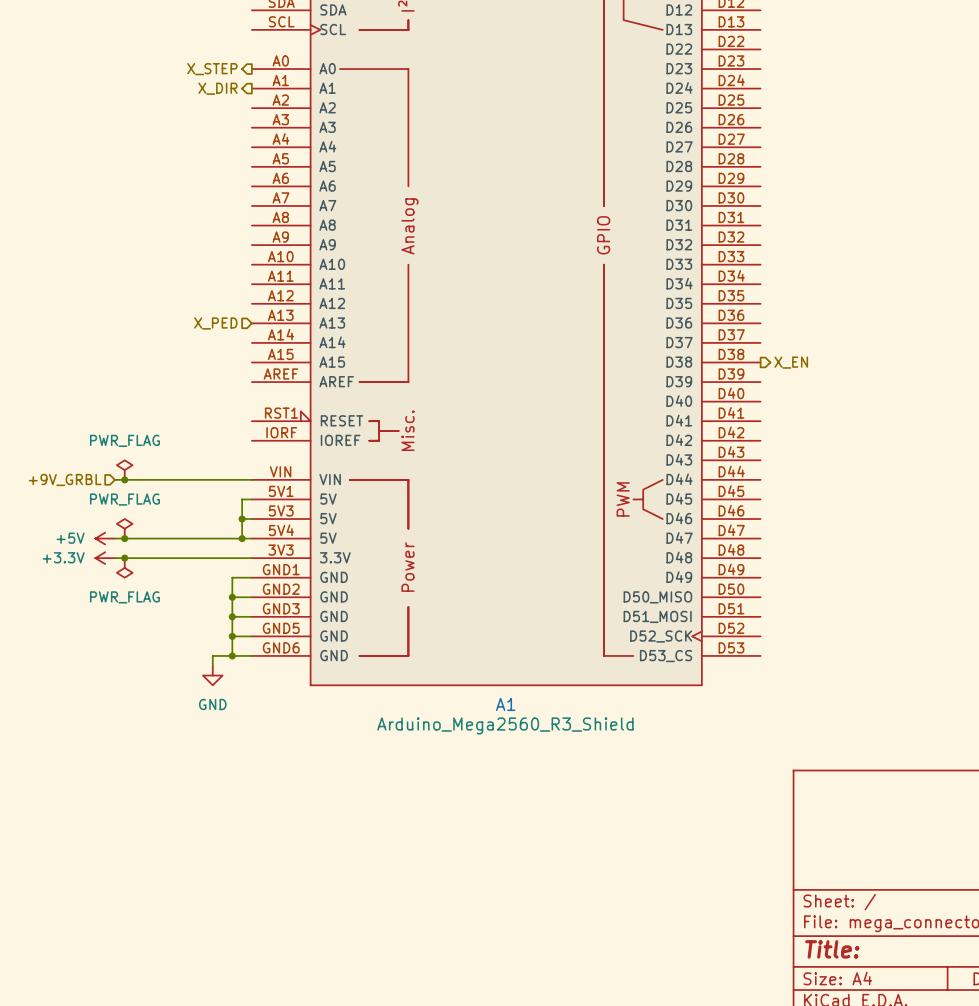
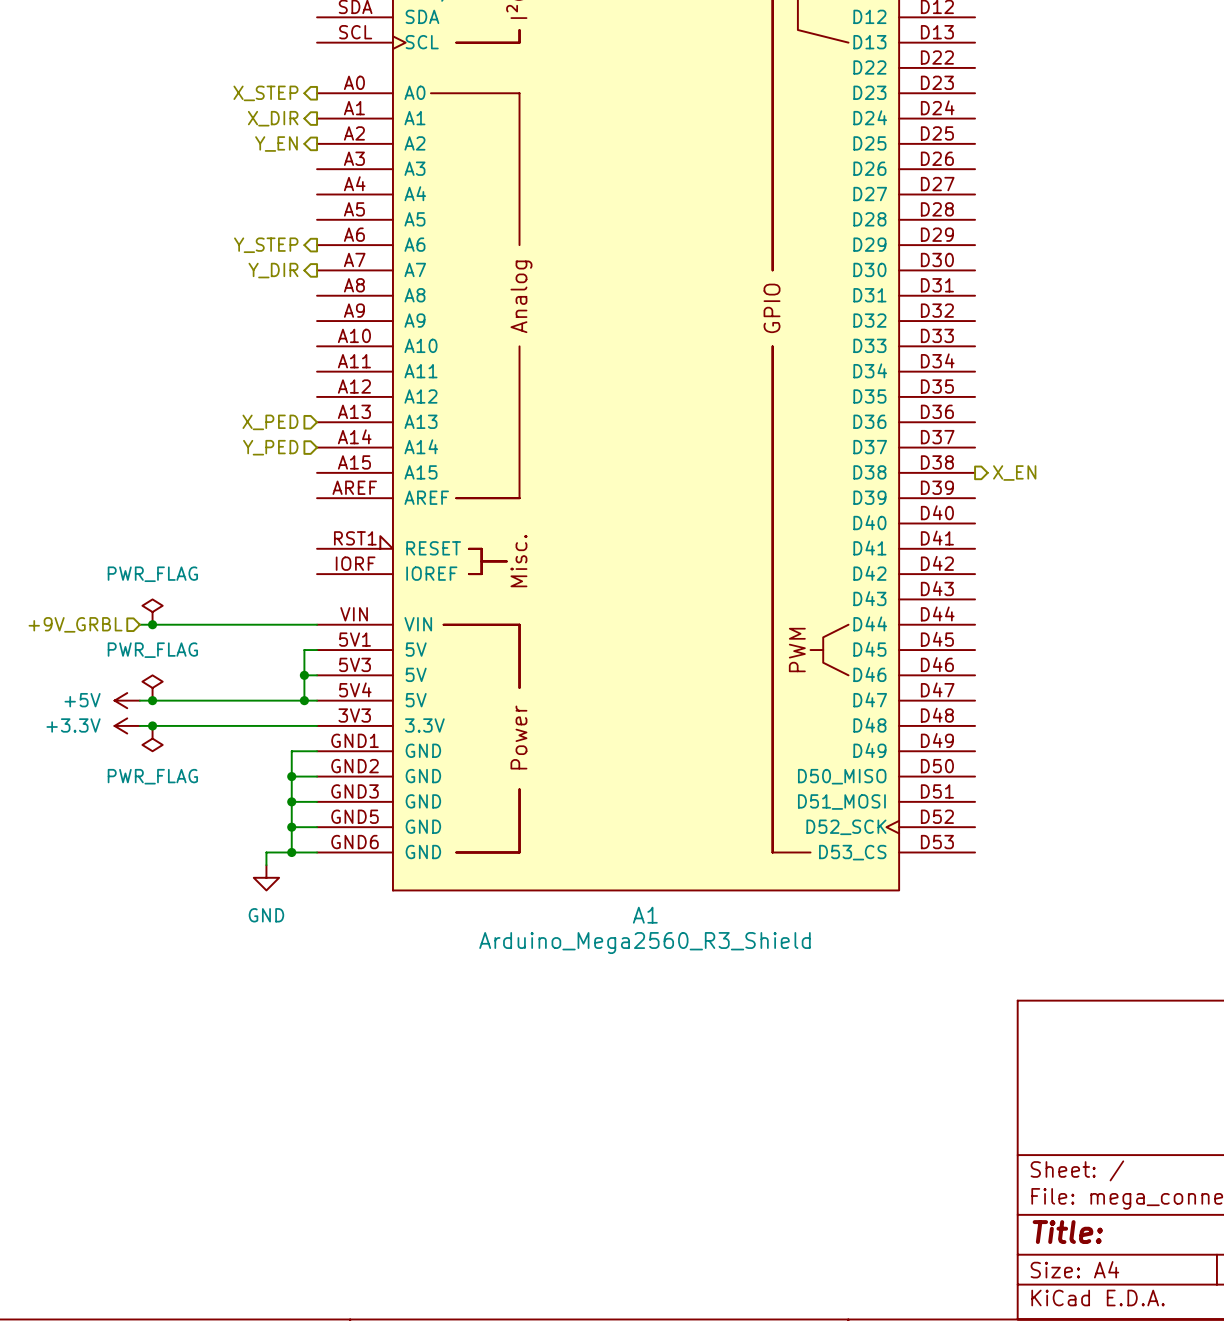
hierarchical label: none -> Y_EN (276, 144)
hierarchical label: none -> Y_STEP (266, 245)
hierarchical label: none -> Y_DIR (273, 270)
hierarchical label: none -> Y_PED (270, 447)

